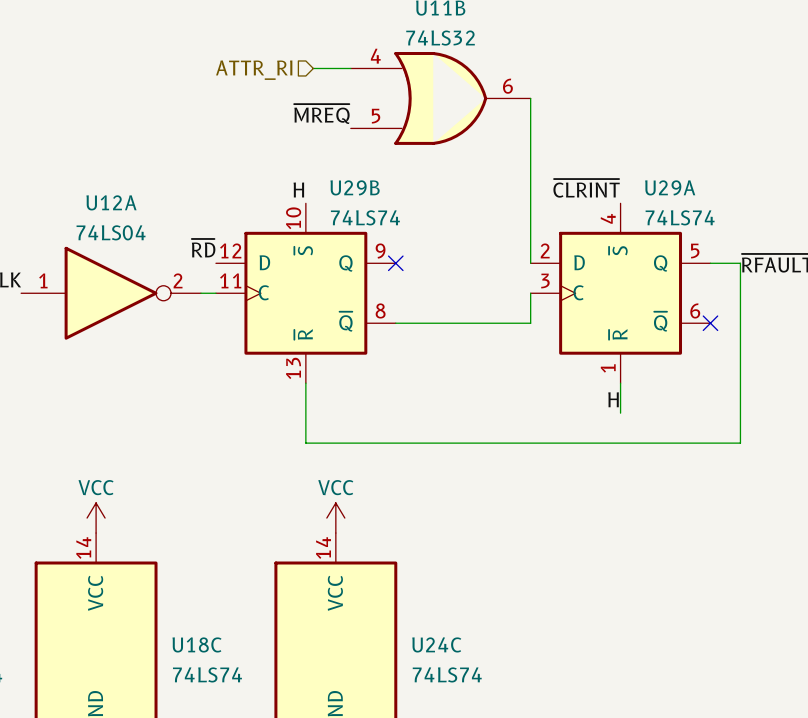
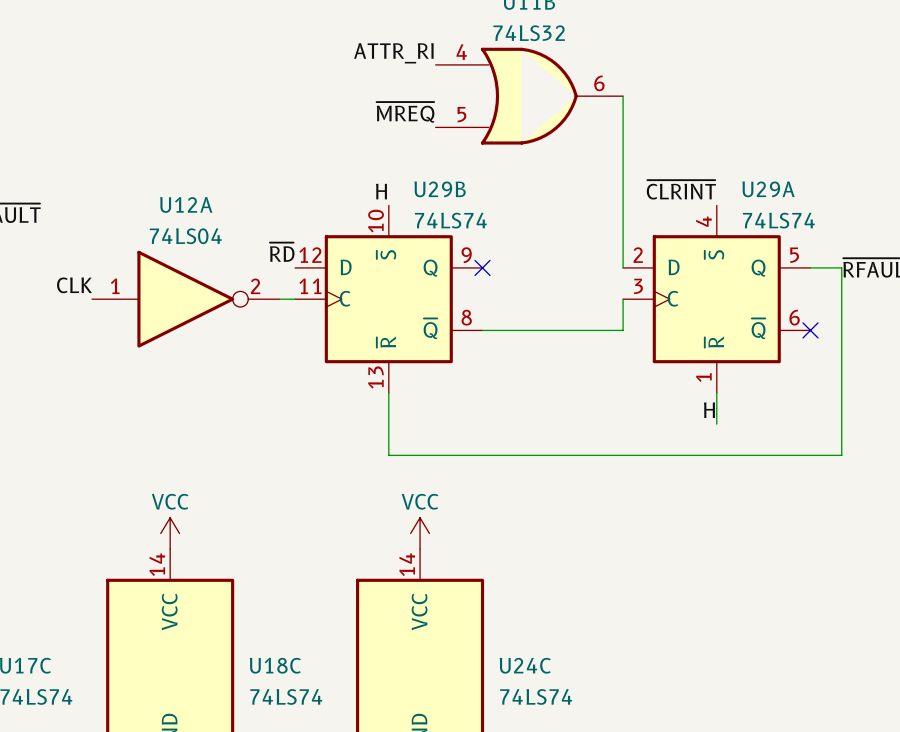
label: none -> ATTR_RI (393, 53)
wire: (313, 68) (350, 68) -> none
hierarchical label: ATTR_RI (254, 70) -> none

